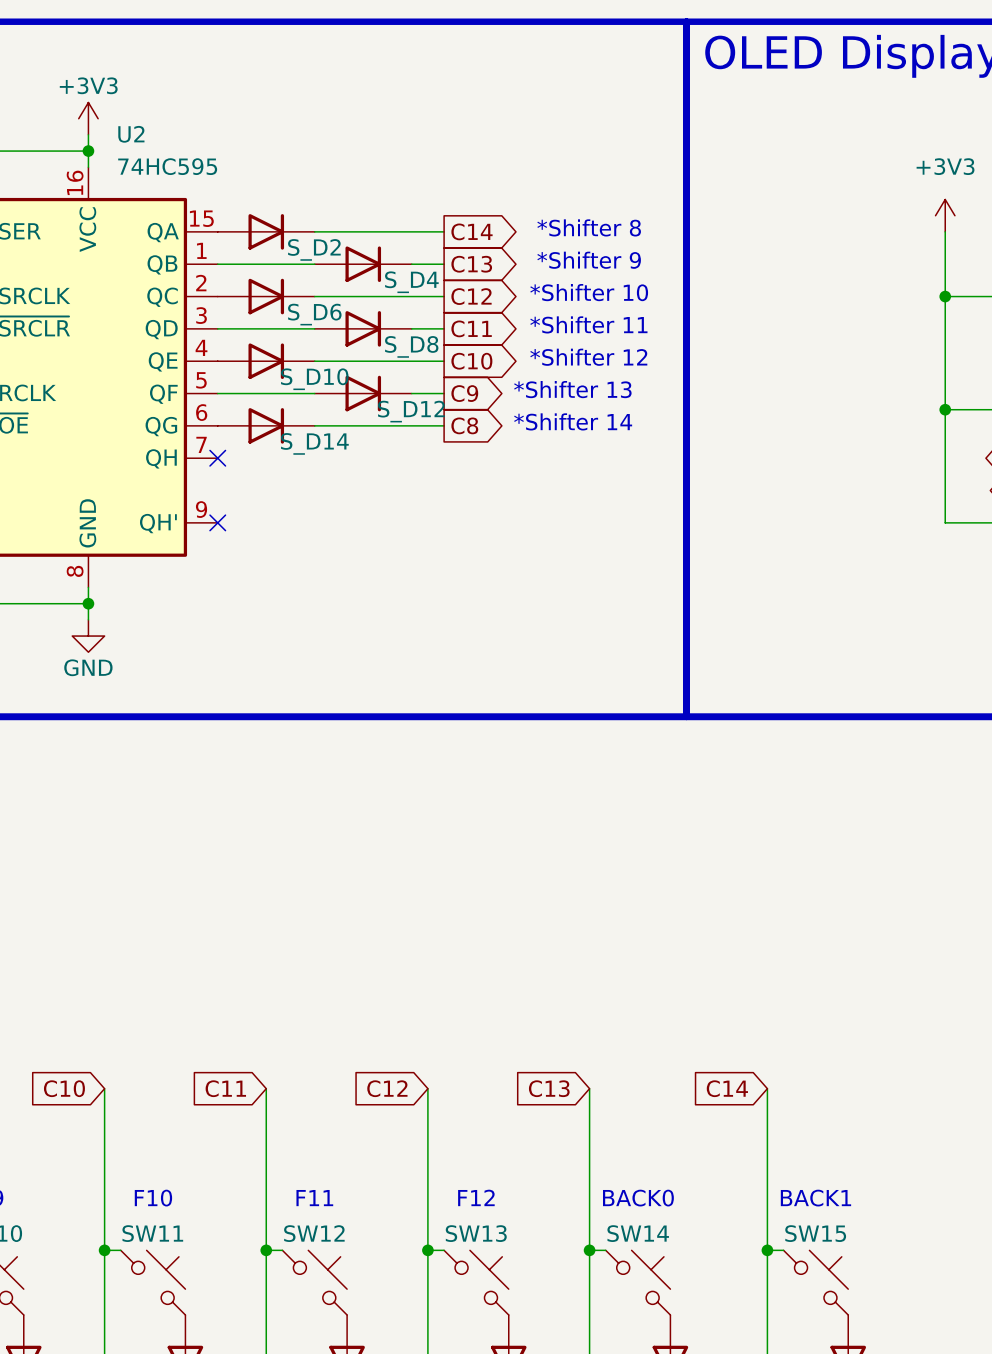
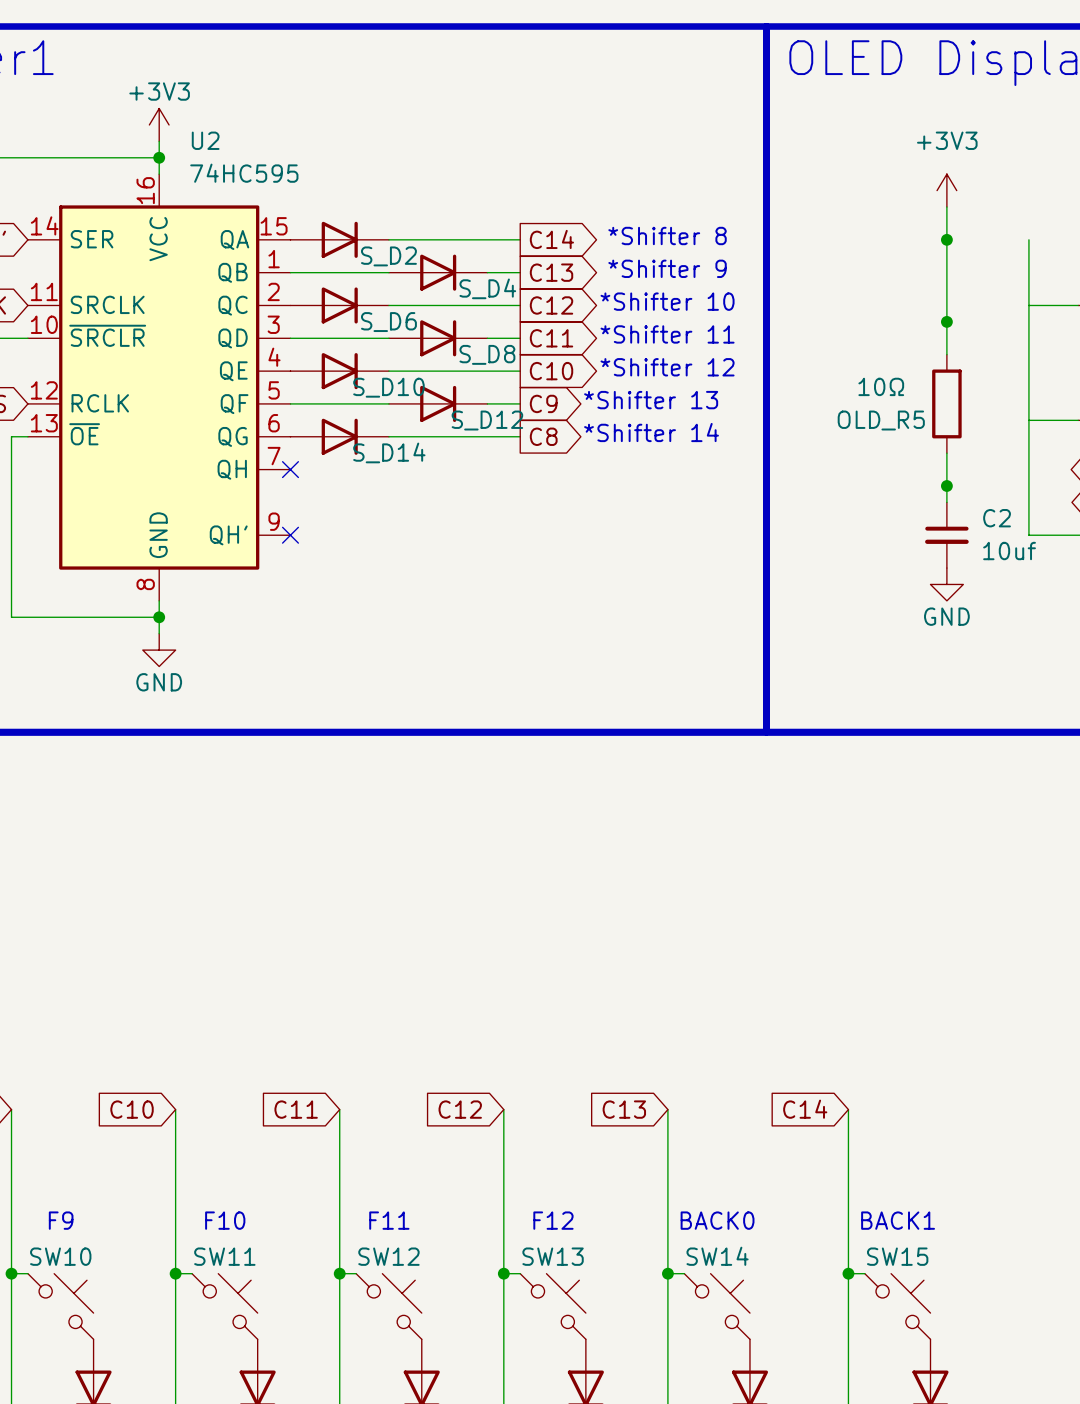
wire: none -> (946, 207) (946, 354)
power symbol position: +3V3 (945, 215) -> +3V3 (946, 190)
junction: none -> (946, 239)
junction: (945, 296) -> none
junction: none -> (946, 321)
OLD_R5: none -> 10Ω (946, 403)
junction: (945, 409) -> none
wire: none -> (946, 453) (946, 502)
junction: none -> (946, 485)
C2: none -> 10uf (946, 535)
power symbol: none -> GND (946, 584)

